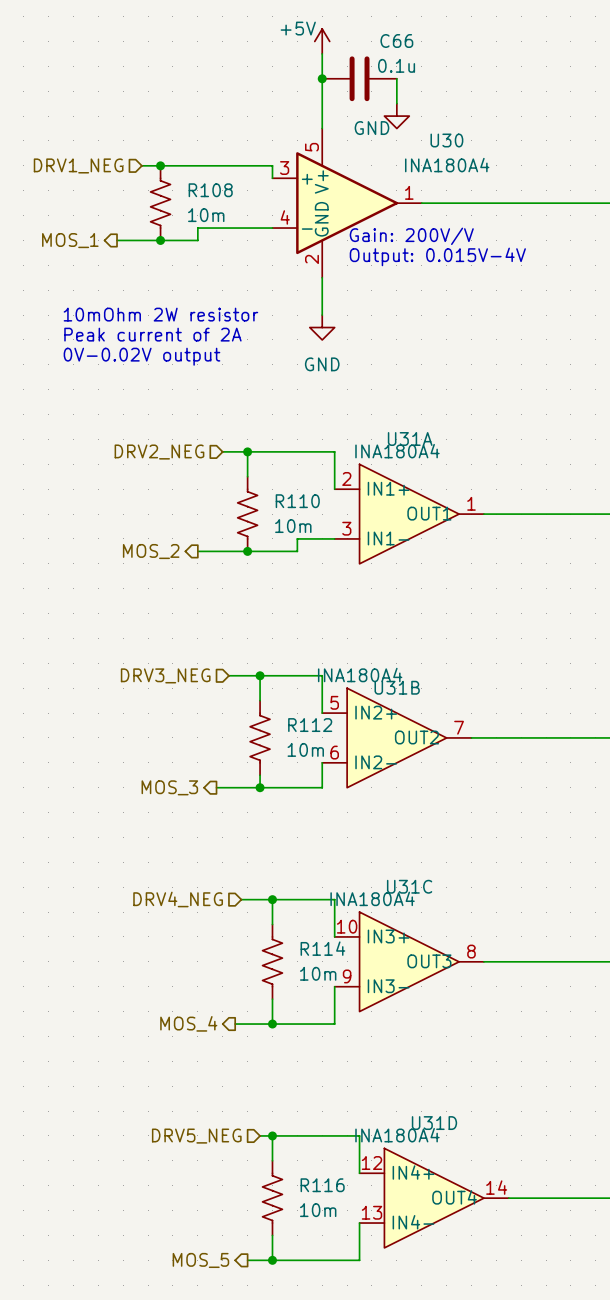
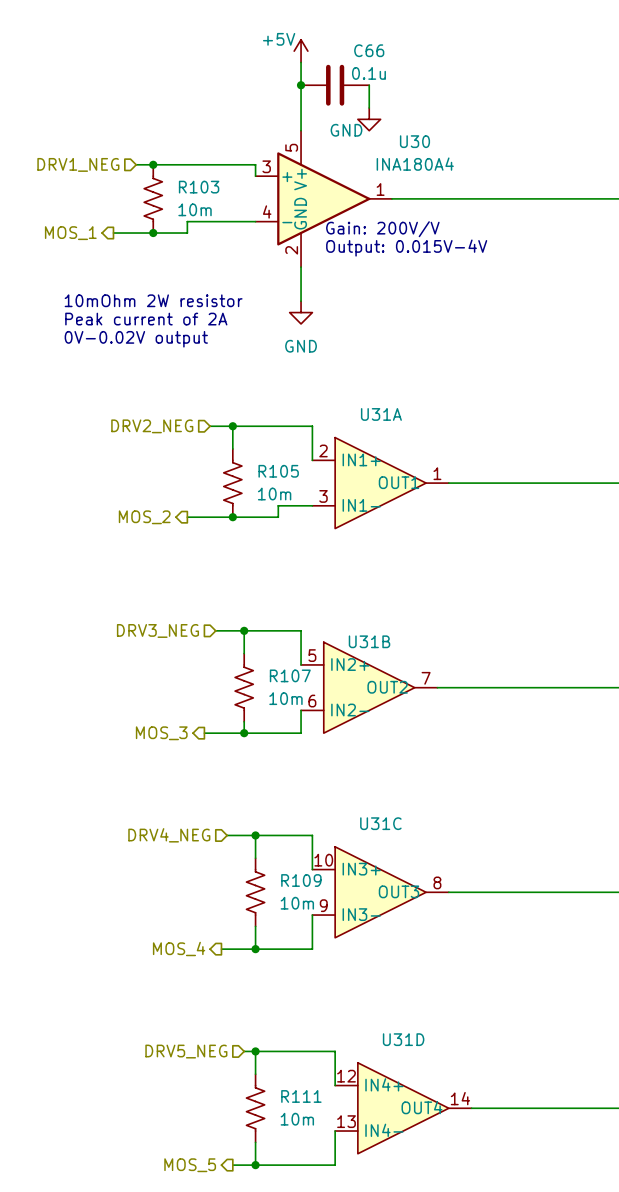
R108 name: R108 (210, 190) -> R103 (199, 187)
U31A value: INA180A4 (397, 451) -> none
R110 name: R110 (297, 501) -> R105 (278, 471)
U31B value: INA180A4 (360, 675) -> none
R112 name: R112 (310, 725) -> R107 (290, 675)
U31C value: INA180A4 (372, 898) -> none
R114 name: R114 (322, 948) -> R109 (301, 880)
U31D value: INA180A4 (397, 1135) -> none
R116 name: R116 (322, 1185) -> R111 (301, 1096)

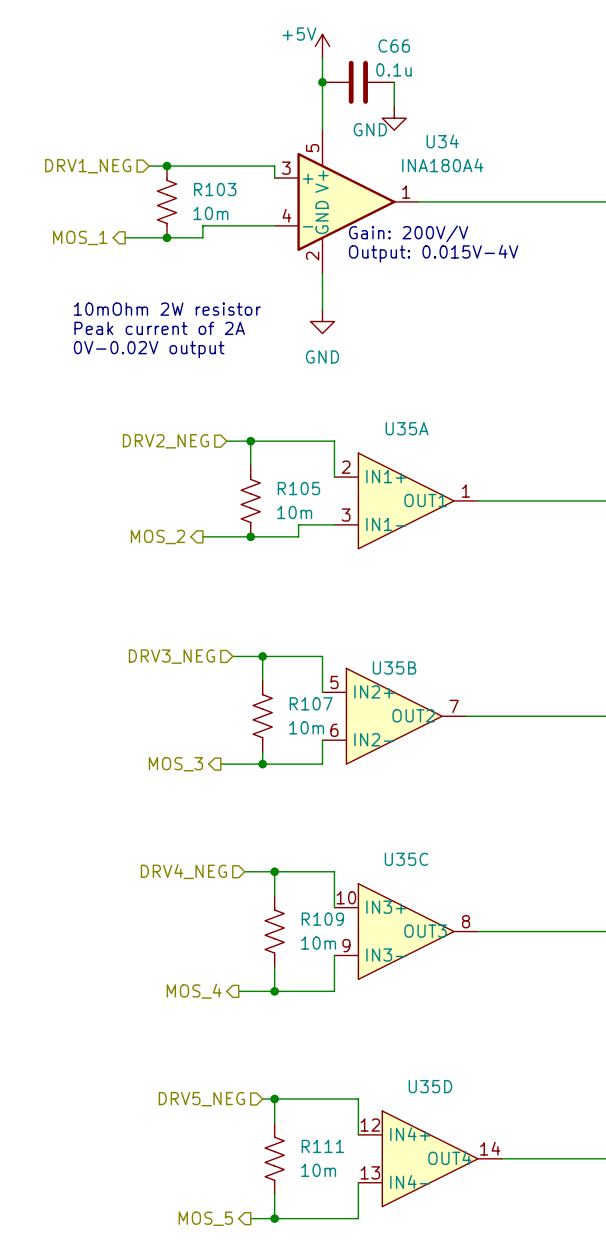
U30 name: U30 (414, 141) -> U34 (442, 141)
U31A name: U31A (381, 414) -> U35A (407, 428)
U31B name: U31B (369, 641) -> U35B (394, 667)
U31C name: U31C (380, 823) -> U35C (406, 859)
U31D name: U31D (403, 1039) -> U35D (430, 1086)

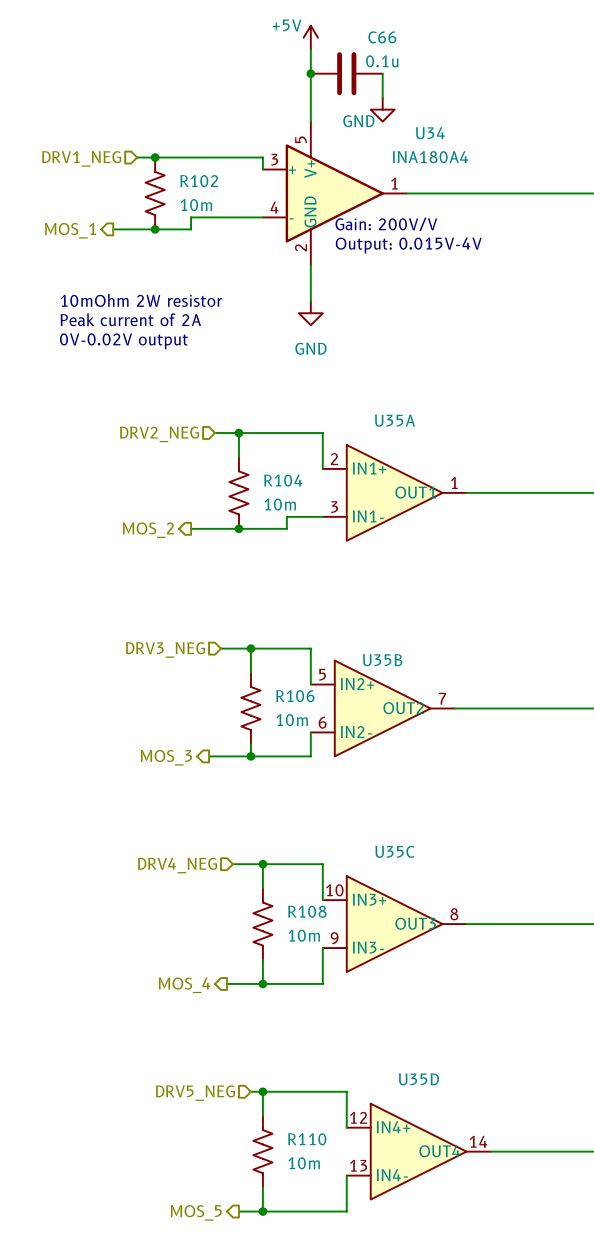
R103 name: R103 (215, 189) -> R102 (199, 181)
R105 name: R105 (298, 488) -> R104 (283, 480)
R107 name: R107 (311, 703) -> R106 (295, 696)
R109 name: R109 (322, 919) -> R108 (307, 911)
R111 name: R111 (322, 1146) -> R110 (307, 1139)

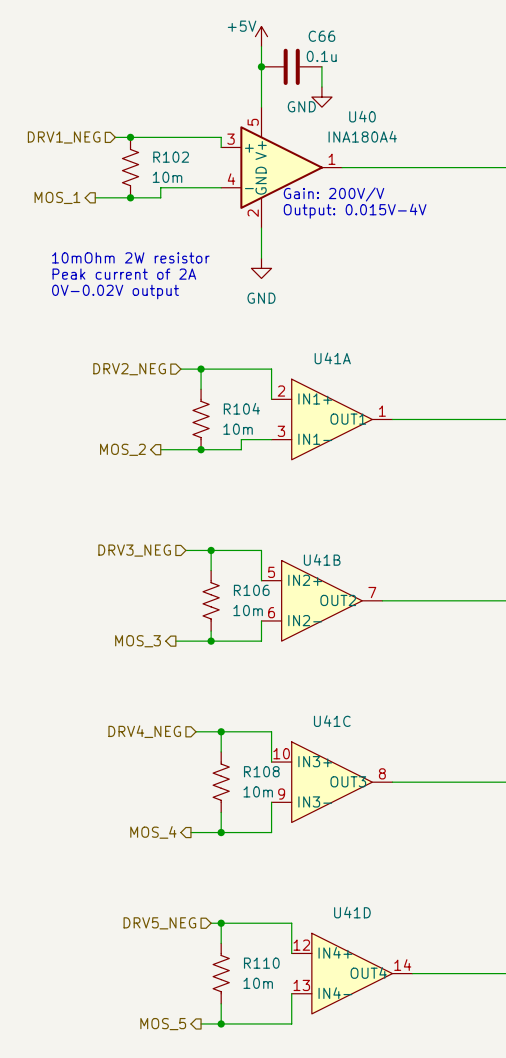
U34 name: U34 (430, 133) -> U40 (362, 116)
U35A name: U35A (395, 420) -> U41A (332, 358)
U35B name: U35B (382, 660) -> U41B (322, 559)
U35C name: U35C (394, 851) -> U41C (332, 721)
U35D name: U35D (418, 1079) -> U41D (352, 912)

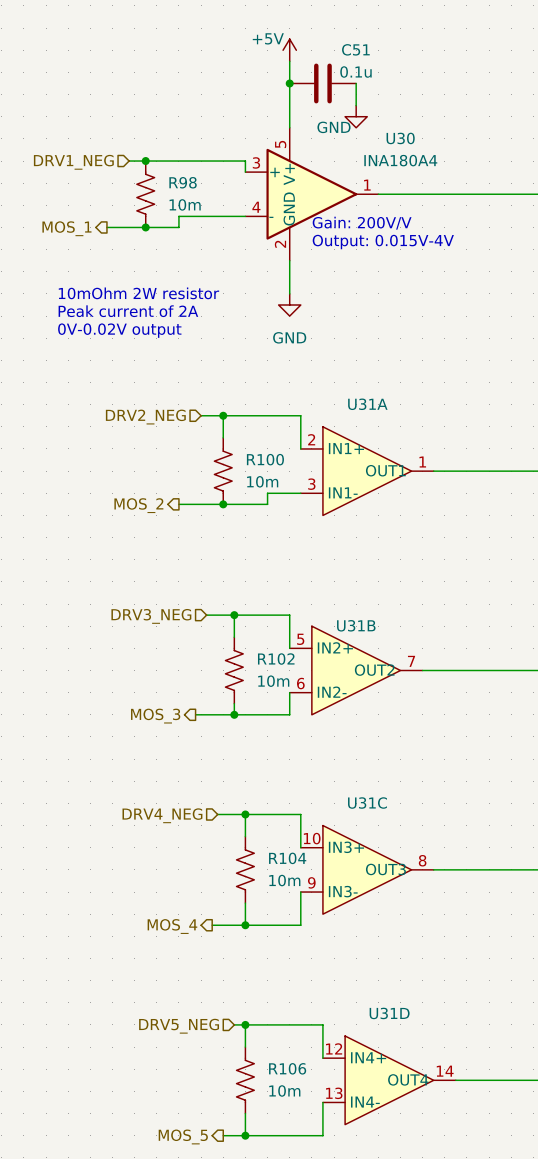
C66 name: C66 (321, 36) -> C51 (355, 49)
U40 name: U40 (362, 116) -> U30 (400, 138)
R102 name: R102 (171, 157) -> R98 (183, 182)
U41A name: U41A (332, 358) -> U31A (367, 404)
R104 name: R104 (241, 408) -> R100 (265, 459)
U41B name: U41B (322, 559) -> U31B (356, 625)
R106 name: R106 (251, 590) -> R102 (276, 659)
U41C name: U41C (332, 721) -> U31C (367, 803)
R108 name: R108 (261, 771) -> R104 (287, 858)
U41D name: U41D (352, 912) -> U31D (389, 1013)
R110 name: R110 (261, 963) -> R106 (287, 1068)

